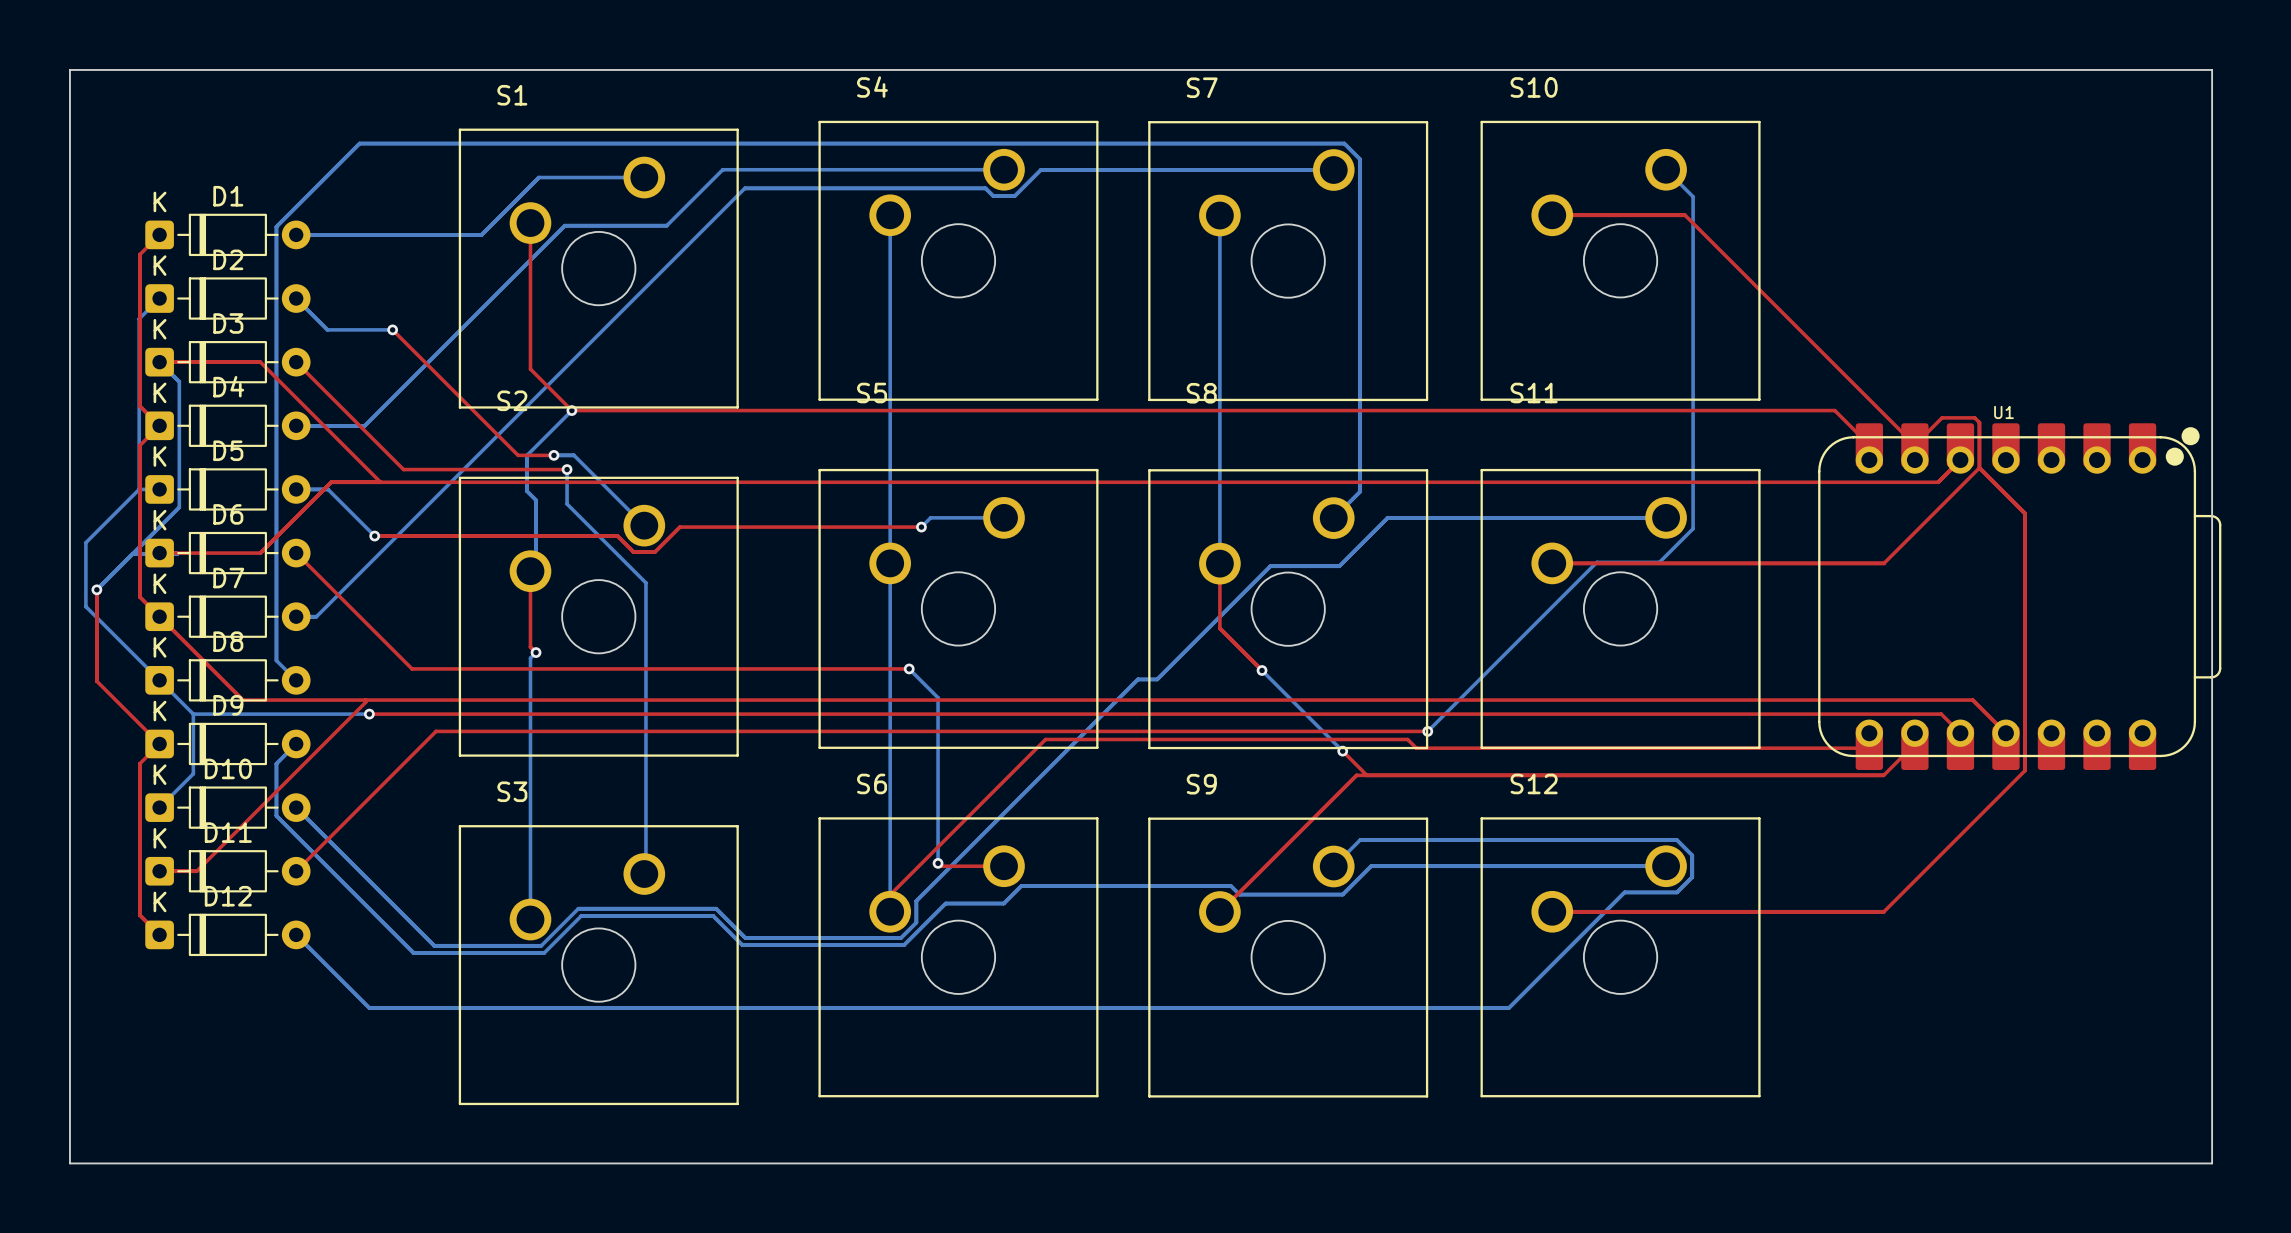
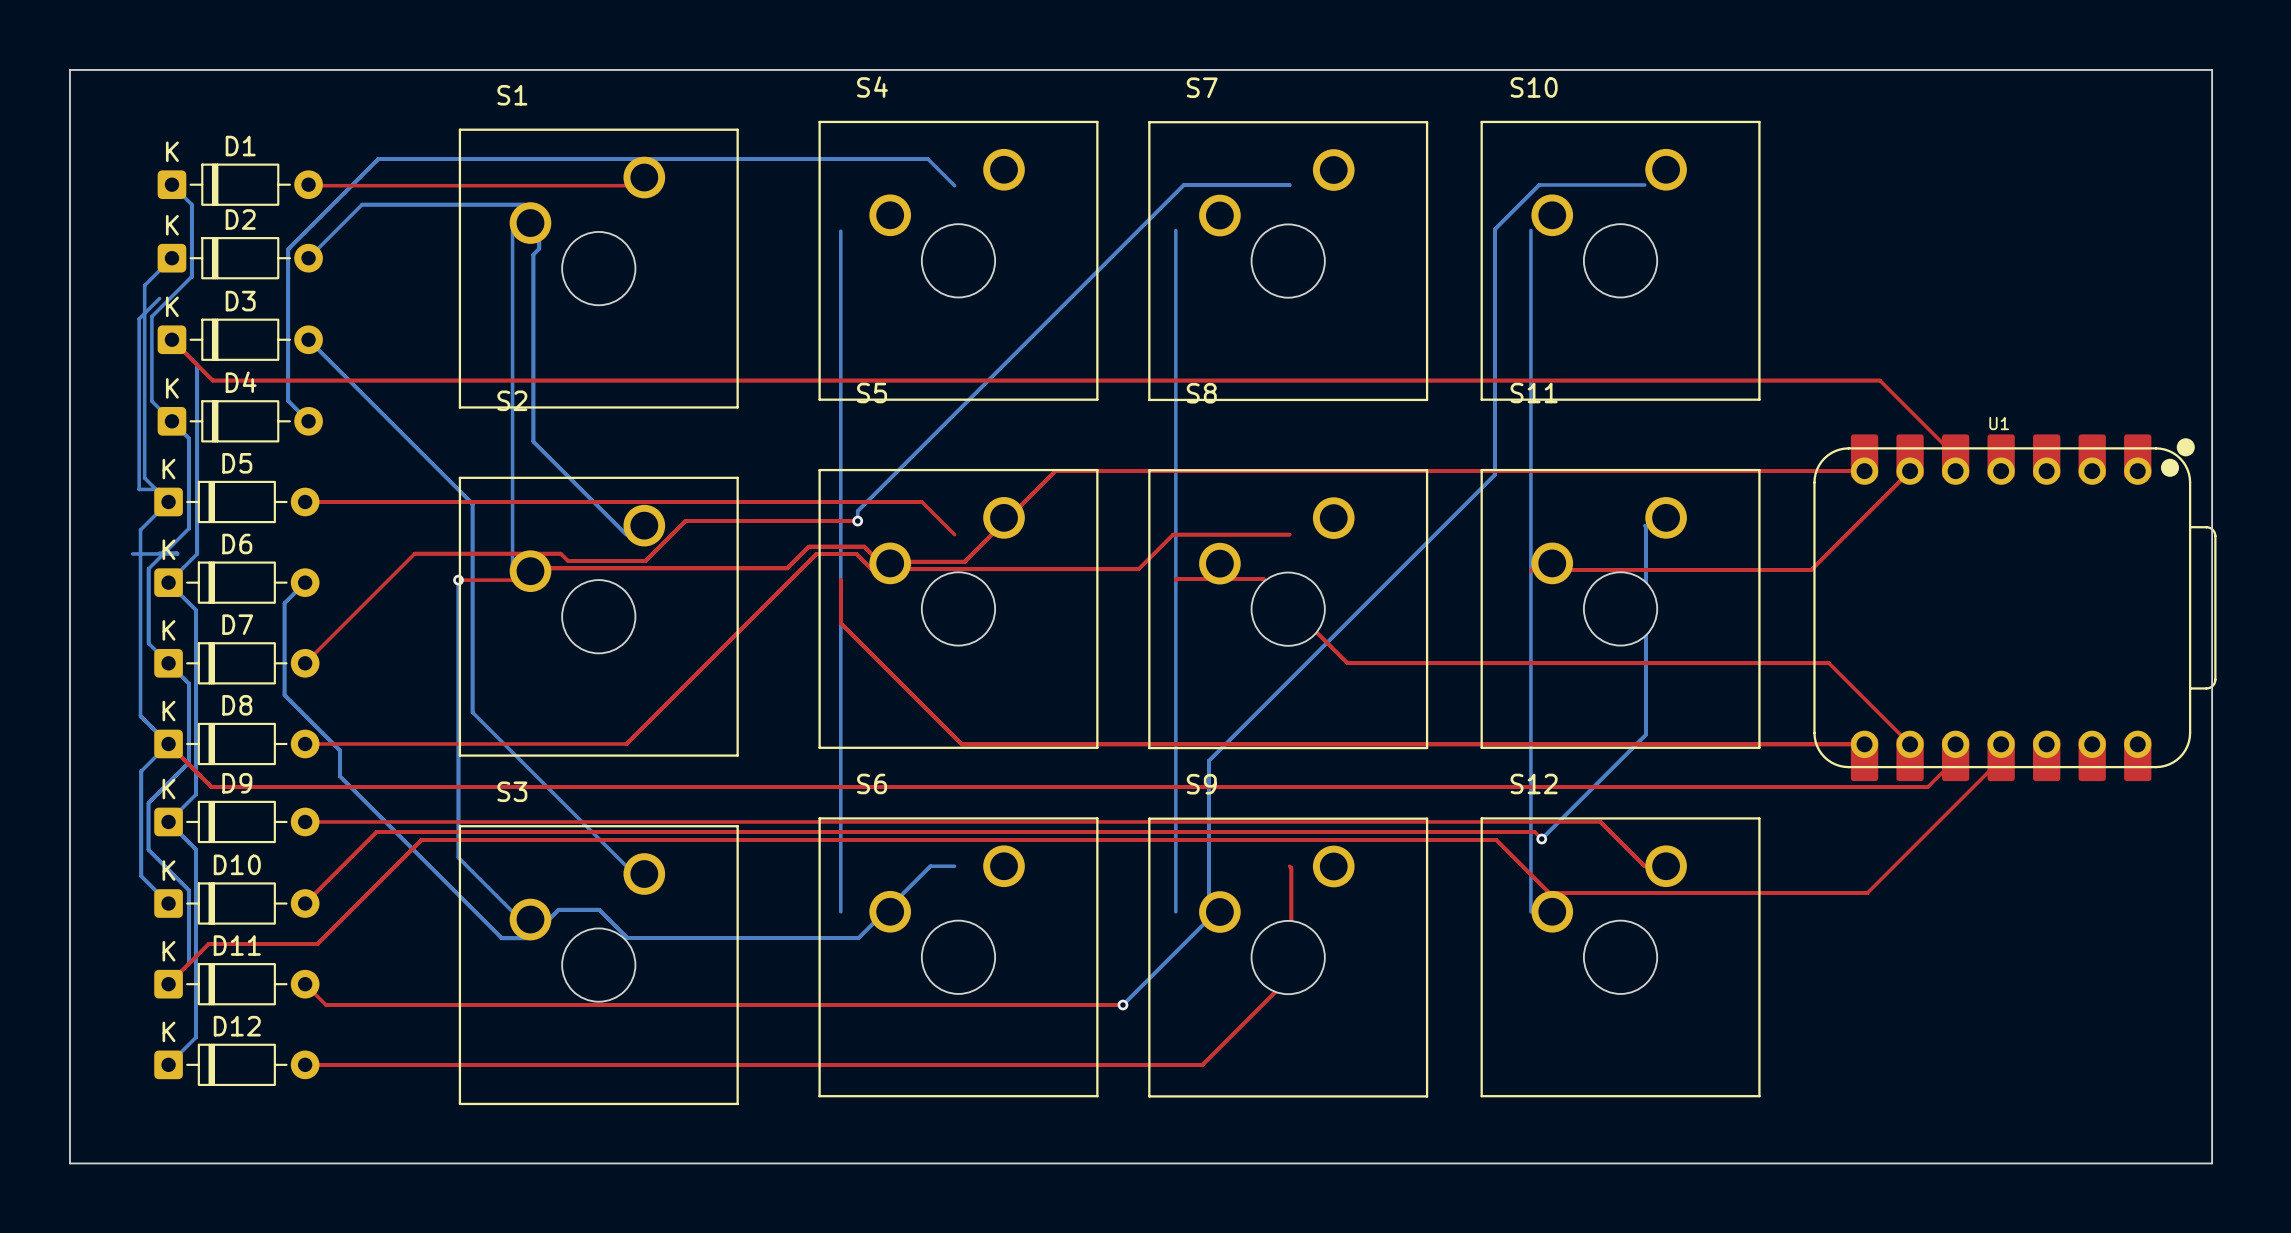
bottom track: (1004, 169) (722, 169) (666, 225) (564, 225) (364, 425) (296, 425) -> none
bottom track: (1666, 169) (1693, 196) (1693, 528) (1659, 562) (1596, 562) (1427, 731) -> none
bottom track: (1333, 170) (1040, 170) (1014, 195) (993, 195) (985, 188) (744, 188) (316, 616) (296, 616) -> none
bottom track: (644, 177) (538, 177) (481, 234) (296, 234) -> none
bottom track: none -> (171, 184) (191, 204) (191, 276) (151, 316) (151, 401) (189, 438) (189, 528) (148, 568) (148, 643) (189, 683) (189, 762) (148, 803) (148, 849) (188, 890) (188, 963) (168, 984)
top track: none -> (308, 184) (626, 185)
bottom track: none -> (1644, 184) (1539, 184) (1495, 229) (1495, 474) (1208, 760) (1208, 919) (1122, 1005)
bottom track: none -> (954, 185) (927, 158) (378, 158) (288, 249) (288, 401) (308, 421)
bottom track: none -> (1289, 185) (1183, 185) (857, 511) (857, 521)
bottom track: (890, 215) (890, 911) -> none
bottom track: (1219, 215) (1219, 563) -> none
top track: (1552, 215) (1685, 215) (1914, 445) -> none
top track: (530, 223) (530, 369) (571, 410) (1834, 410) (1869, 445) (1869, 460) -> none
bottom track: none -> (1175, 230) (1175, 911)
bottom track: none -> (1530, 230) (1530, 911)
bottom track: none -> (512, 231) (512, 580)
bottom track: none -> (840, 231) (840, 911)
top track: (159, 234) (139, 254) (139, 406) (159, 425) (139, 445) (139, 596) (242, 700) (1972, 700) (2005, 733) (2005, 748) -> none
D1 position: (227, 234) -> (240, 184)
bottom track: none -> (171, 258) (144, 285) (144, 478) (168, 501) (140, 530) (140, 715) (168, 743) (141, 771) (141, 876) (168, 903)
bottom track: none -> (308, 258) (362, 204) (524, 204) (539, 219) (539, 248) (533, 254) (533, 441) (626, 534)
D2 position: (227, 298) -> (240, 258)
bottom track: (296, 298) (327, 329) (392, 329) -> none
top track: (392, 329) (518, 455) (553, 455) -> none
via: (392, 329) -> none
top track: none -> (171, 339) (212, 380) (1879, 380) (1955, 456) (1955, 471)
bottom track: none -> (171, 339) (197, 365) (197, 553) (168, 582) (196, 610) (196, 794) (168, 821) (196, 849) (196, 1037) (168, 1064)
bottom track: none -> (308, 339) (472, 503) (472, 712) (626, 866)
top track: (159, 362) (260, 362) (380, 482) -> none
bottom track: (159, 362) (179, 381) (179, 507) (96, 589) -> none
D3 position: (227, 362) -> (240, 339)
top track: (296, 362) (403, 469) (567, 469) -> none
bottom track: (571, 410) (527, 455) (527, 491) (536, 500) (536, 565) (530, 571) -> none
via: (571, 410) -> none
D4 position: (227, 425) -> (240, 421)
top track: (1914, 445) (1942, 417) (1974, 417) (1979, 422) (1979, 467) -> none
top track: (1960, 445) (1960, 460) (1938, 482) (331, 482) (260, 553) (159, 553) -> none
bottom track: (553, 455) (574, 455) (644, 525) (643, 527) -> none
via: (553, 455) -> none
top track: none -> (1864, 456) (1864, 471) (1055, 471) (964, 561) (879, 561) (864, 546) (809, 546) (787, 568) (524, 568) (512, 580) (458, 580)
top track: none -> (1910, 456) (1910, 471) (1811, 570) (1530, 571)
top track: (1979, 467) (1883, 563) (1552, 563) -> none
top track: (1979, 467) (2024, 513) (2024, 770) (1883, 911) (1552, 911) -> none
bottom track: (567, 469) (567, 504) (645, 582) (645, 872) (644, 874) -> none
via: (567, 469) -> none
bottom track: (139, 489) (85, 542) (85, 606) (193, 714) -> none
D5 position: (227, 489) -> (236, 501)
bottom track: (296, 489) (328, 489) (374, 536) -> none
top track: none -> (305, 501) (921, 501) (954, 534)
bottom track: (1004, 517) (930, 517) (921, 527) -> none
bottom track: (1666, 517) (1387, 517) (1339, 566) (1270, 566) (1157, 679) (1137, 679) (916, 900) (916, 922) (901, 937) (858, 938) -> (954, 866) (930, 866) (858, 938)
bottom track: (1333, 518) (1359, 491) (1359, 159) (1344, 143) (359, 143) (276, 226) (276, 660) (296, 680) -> none
top track: none -> (857, 521) (685, 521) (645, 561) (568, 561) (560, 553) (414, 553) (305, 663)
bottom track: none -> (1644, 525) (1646, 734) (1541, 839)
top track: (921, 527) (679, 527) (655, 551) (633, 551) (617, 536) (374, 536) -> none
via position: (921, 527) -> (857, 521)
top track: none -> (1289, 534) (1173, 534) (1138, 569) (871, 569) (856, 553) (816, 553) (626, 743) (305, 743)
via: (374, 536) -> none
D6 position: (227, 553) -> (236, 582)
top track: (296, 553) (412, 668) (909, 668) -> none
top track: (1219, 563) (1219, 628) (1262, 670) -> none
top track: (530, 571) (530, 647) (536, 652) -> none
bottom track: none -> (458, 580) (458, 857) (512, 911)
via: none -> (458, 580)
top track: none -> (840, 580) (840, 623) (961, 744) (1864, 744) (1864, 759)
top track: none -> (1175, 580) (1263, 578) (1347, 663) (1828, 663) (1910, 744) (1910, 759)
top track: (96, 589) (96, 681) (159, 743) (139, 763) (139, 915) (159, 934) -> none
via: (96, 589) -> none
U1 position: (2019, 596) -> (2014, 607)
D7 position: (227, 616) -> (236, 663)
bottom track: (536, 652) (530, 658) (530, 919) -> none
via: (536, 652) -> none
bottom track: (909, 668) (938, 697) (938, 863) -> none
via: (909, 668) -> none
bottom track: (1262, 670) (1342, 751) -> none
via: (1262, 670) -> none
D8 position: (227, 680) -> (236, 743)
top track: (365, 700) (365, 702) (196, 871) (159, 871) -> none
bottom track: (193, 714) (193, 773) (159, 807) -> none
bottom track: (193, 714) (369, 714) -> none
top track: (369, 714) (1941, 714) (1960, 733) (1960, 748) -> none
via: (369, 714) -> none
top track: (1427, 731) (436, 731) (296, 871) -> none
via: (1427, 731) -> none
top track: (1869, 733) (1869, 748) (1416, 748) (1407, 739) (1045, 739) (890, 894) (890, 911) -> none
top track: (1914, 733) (1914, 744) (1883, 775) (1356, 775) (1219, 912) -> none
top track: none -> (168, 743) (211, 787) (1927, 787) (1955, 759) (1955, 744)
D9 position: (227, 743) -> (236, 821)
bottom track: (296, 743) (276, 763) (276, 815) (413, 952) (544, 952) (581, 915) (713, 915) (742, 945) (904, 945) (945, 903) (1003, 903) (1021, 885) (1230, 885) (1239, 894) (1342, 894) (1371, 866) (1666, 866) -> none
top track: none -> (2001, 744) (2001, 759) (1867, 893) (1549, 893) (1496, 839) (421, 839) (317, 943) (208, 943) (168, 984)
top track: (1342, 751) (1366, 775) -> none
via: (1342, 751) -> none
D10 position: (227, 807) -> (236, 903)
bottom track: (296, 807) (434, 945) (541, 945) (578, 908) (716, 908) (745, 937) -> (305, 582) (284, 603) (284, 695) (339, 750) (339, 776) (501, 938) (530, 938) (558, 909) (599, 909) (627, 938) (745, 937)
top track: none -> (305, 821) (1600, 821) (1644, 866)
top track: none -> (1541, 839) (1534, 831) (376, 831) (305, 903)
via: none -> (1541, 839)
top track: (938, 863) (940, 866) (1004, 866) -> none
via: (938, 863) -> none
top track: none -> (1289, 866) (1291, 867) (1291, 975) (1202, 1064) (305, 1064)
bottom track: (1333, 866) (1360, 840) (1676, 840) (1692, 855) (1692, 877) (1676, 892) (1624, 892) (1508, 1008) (369, 1008) (296, 934) -> none
D11 position: (227, 871) -> (236, 984)
D12 position: (227, 934) -> (236, 1064)
top track: none -> (305, 984) (325, 1005) (1122, 1005)
via: none -> (1122, 1005)

